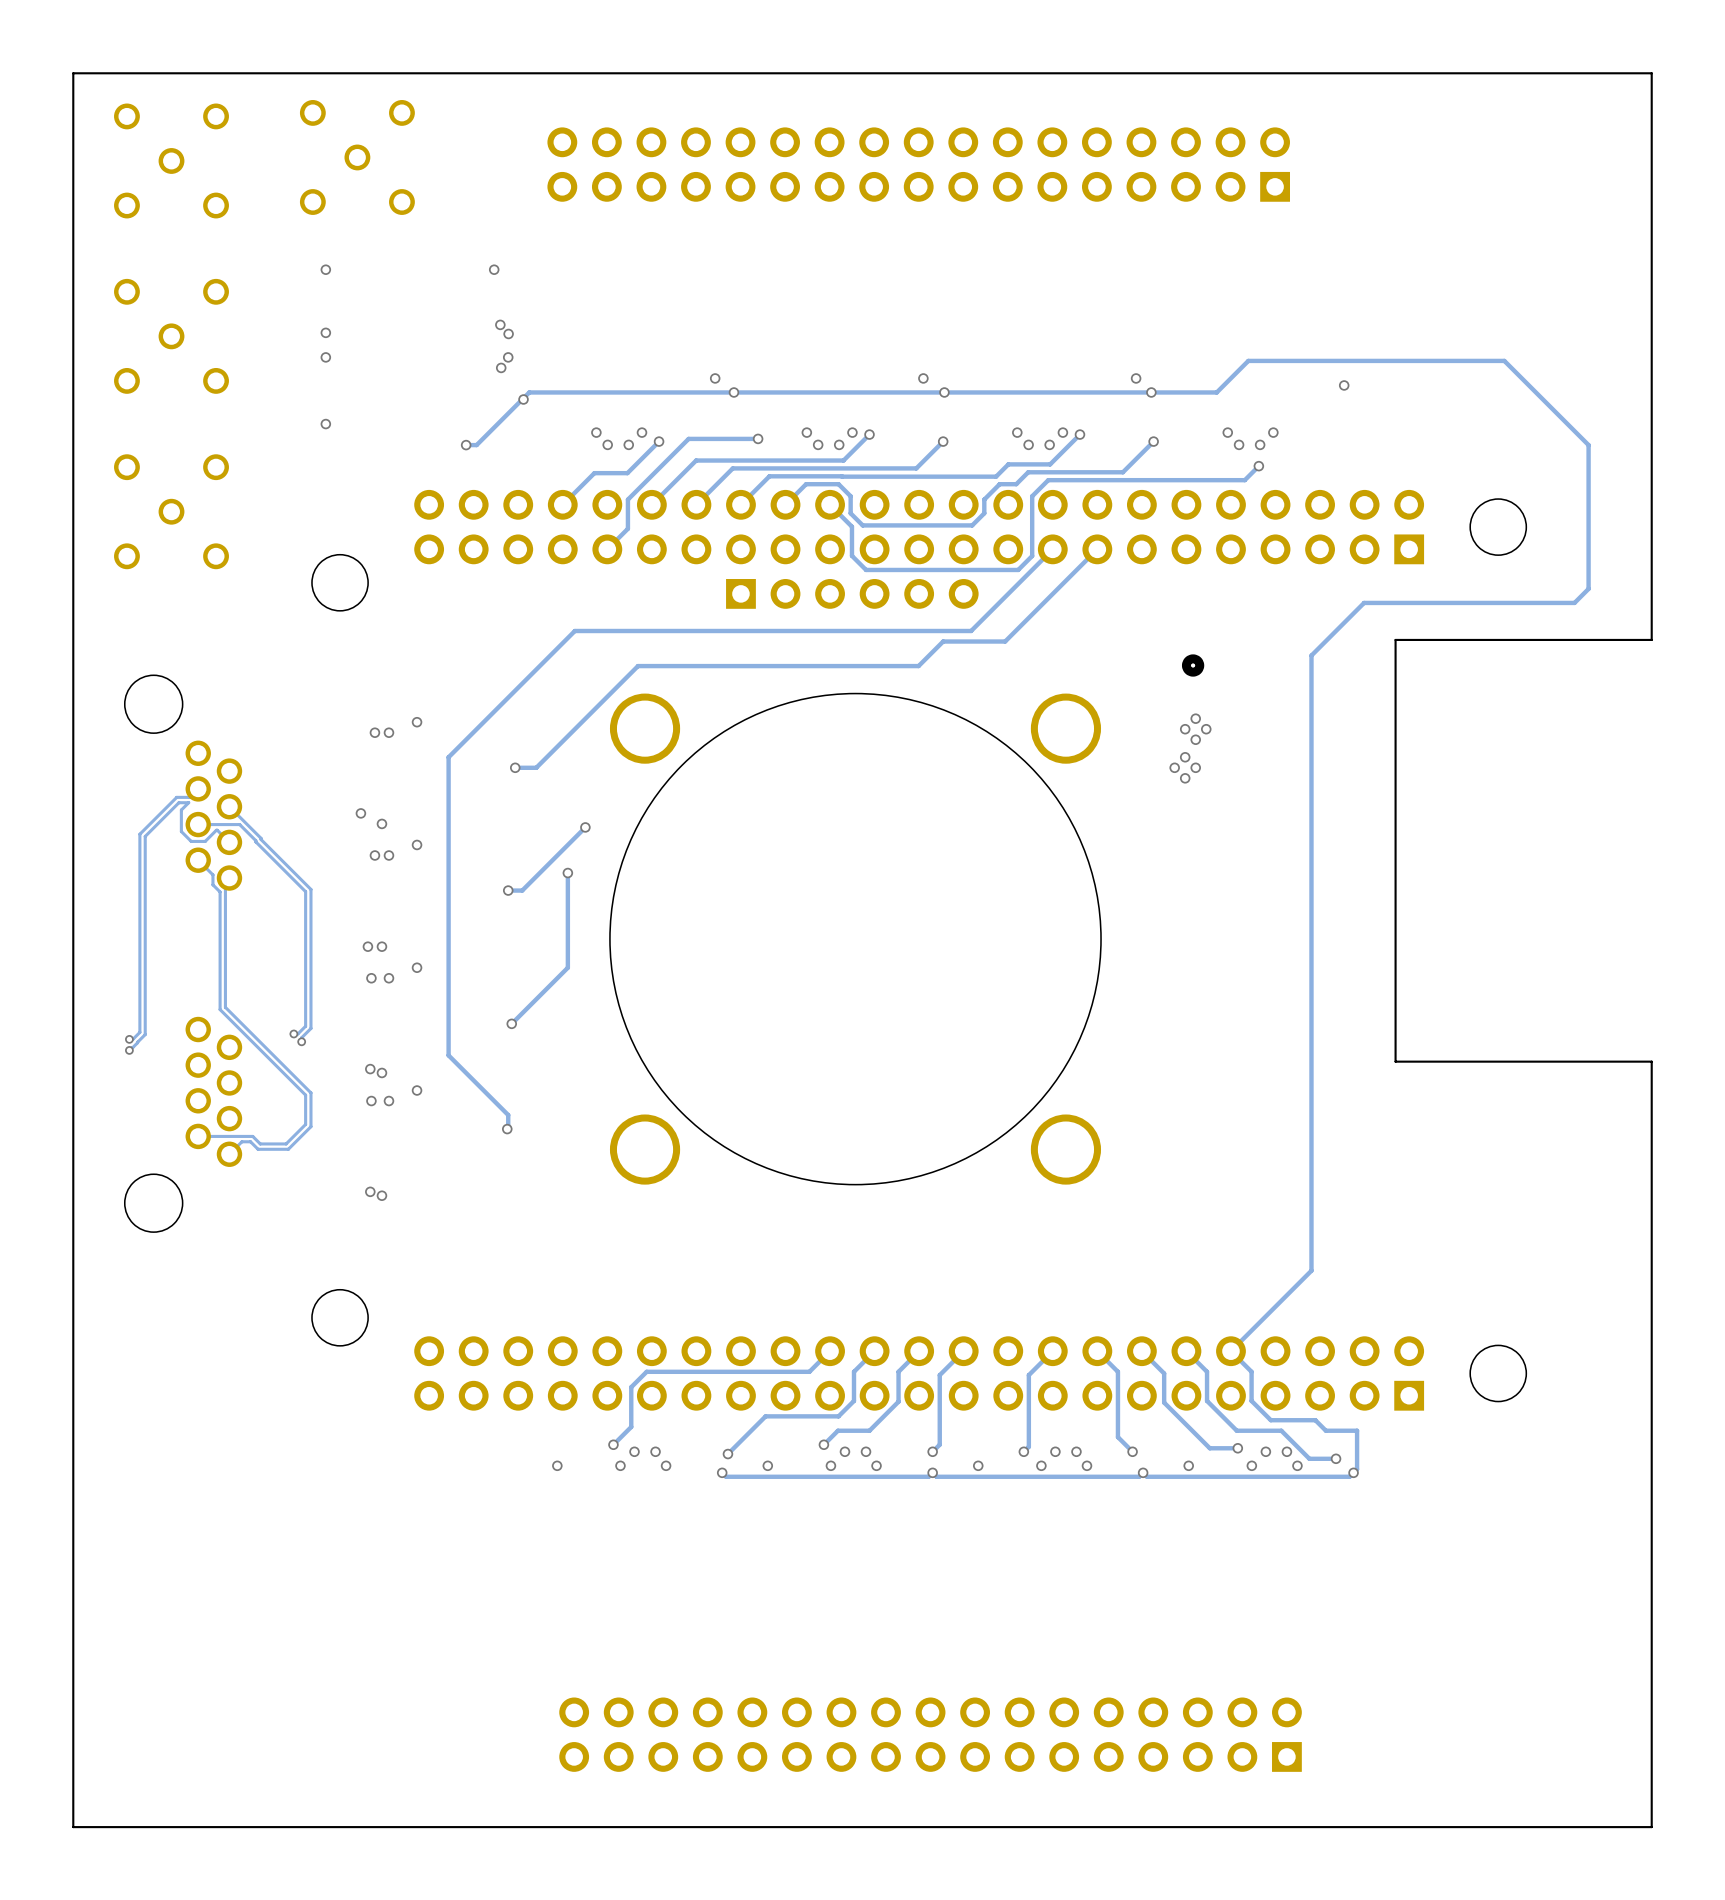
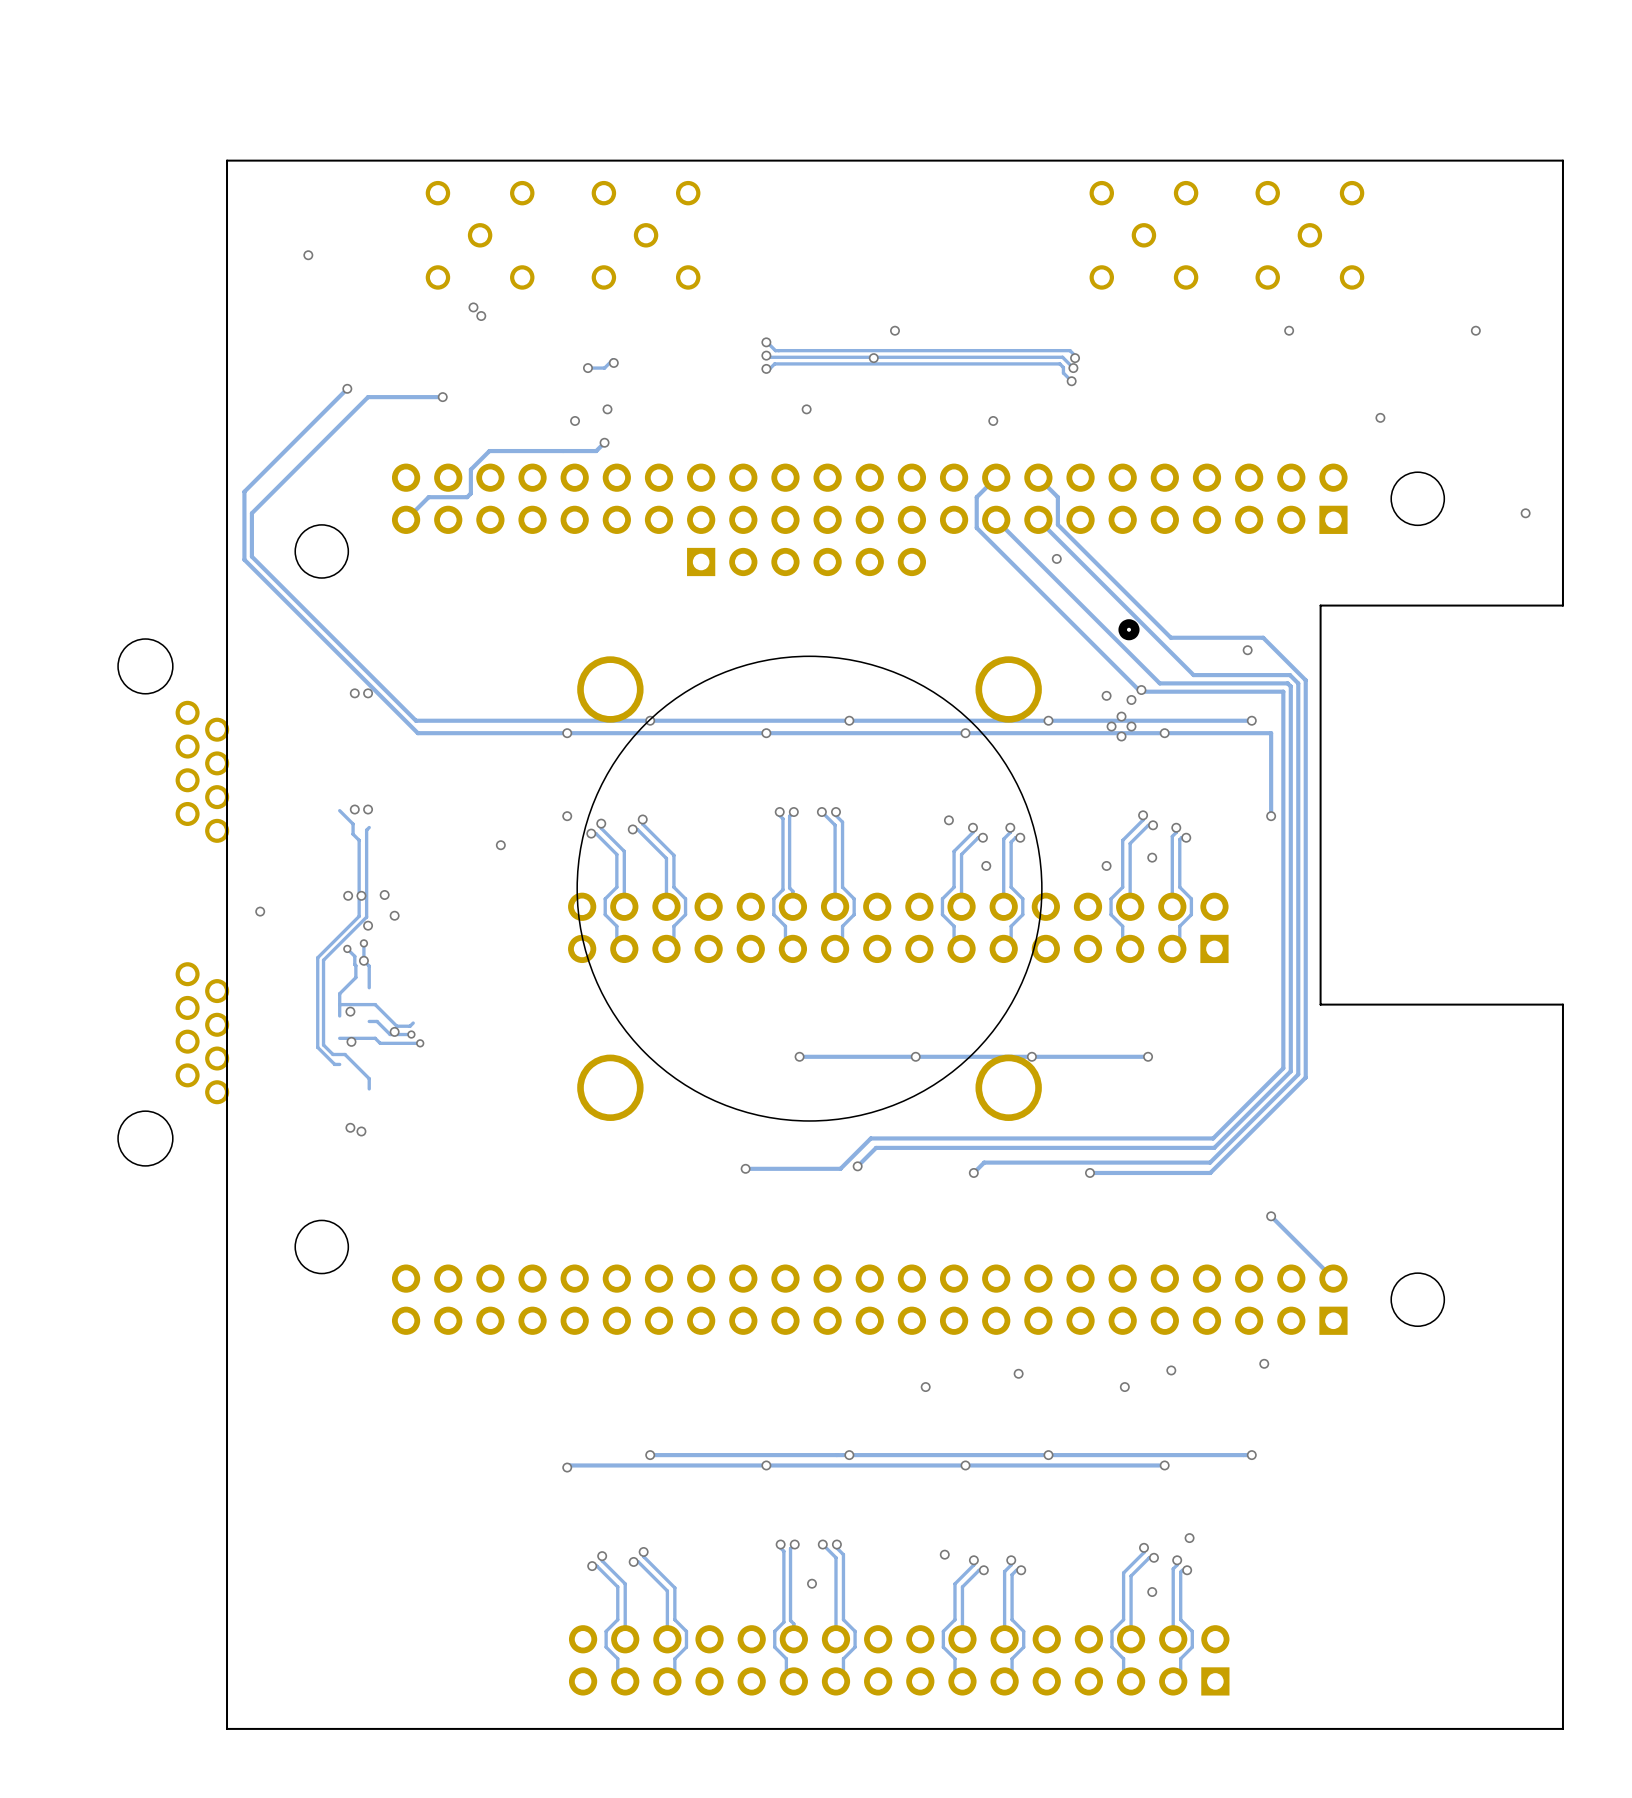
part: (357, 157) -> none
part: (171, 160) -> none
part: (918, 164) -> none
board edge: (1651, 169) (1651, 73) (73, 73) (73, 1827) (239, 1827) -> (1562, 160) (227, 160) (227, 1728)
part: none -> (480, 235)
part: none -> (646, 235)
part: none -> (1143, 235)
part: none -> (1309, 235)
via: (494, 269) -> none
via: (325, 332) -> none
part: (171, 336) -> none
via: none -> (1475, 330)
via: (325, 357) -> none
via: (508, 357) -> none
track: none -> (766, 342) (775, 350) (1070, 350) (1073, 354)
via: none -> (766, 342)
via: (501, 367) -> none
track: none -> (766, 355) (768, 357) (1062, 357) (1073, 368)
via: none -> (766, 355)
via: (715, 378) -> none
track: none -> (613, 362) (612, 359) (604, 368) (587, 368)
via: none -> (613, 362)
via position: (1344, 385) -> (1289, 330)
via: none -> (587, 368)
via: none -> (1073, 368)
track: none -> (766, 368) (769, 368) (774, 363) (1059, 363) (1063, 367) (1063, 373) (1071, 381)
via: none -> (766, 368)
via: (733, 392) -> none
via position: (944, 392) -> (894, 330)
via: (1151, 392) -> none
via: (523, 399) -> none
via: none -> (1071, 381)
track: none -> (347, 388) (244, 491) (244, 559) (417, 733) (1271, 733) (1271, 816)
via: none -> (347, 388)
track: none -> (442, 397) (368, 397) (251, 513) (251, 556) (415, 720) (1251, 720)
via: (325, 424) -> none
via: (596, 432) -> none
via: (806, 432) -> none
via: (1017, 432) -> none
via: (1062, 432) -> none
via: (1227, 432) -> none
via: (1273, 432) -> none
track: (869, 434) (843, 460) (696, 460) (651, 504) -> none
via: (869, 434) -> none
track: (1079, 434) (1050, 464) (1008, 464) (996, 476) (769, 476) (740, 504) -> none
via: (1079, 434) -> none
track: (758, 438) (688, 438) (627, 499) (627, 528) (607, 549) -> none
via: (758, 438) -> none
track: (659, 441) (627, 473) (594, 473) (562, 504) -> none
via: (659, 441) -> none
track: (943, 441) (916, 468) (732, 468) (696, 504) -> none
via: (943, 441) -> none
track: (1153, 441) (1122, 472) (1028, 472) (1016, 484) (999, 484) (984, 499) (984, 513) (972, 525) (862, 525) (850, 513) (850, 496) (838, 484) (806, 484) (785, 504) -> none
via: (1153, 441) -> none
via: none -> (1380, 417)
via: (628, 444) -> none
via: (818, 444) -> none
via: (839, 444) -> none
via: (1028, 444) -> none
via: (1239, 444) -> none
via: (1260, 444) -> none
track: (466, 445) (476, 445) (529, 392) (1216, 392) (1248, 360) (1504, 360) (1588, 445) (1588, 588) (1574, 602) (1364, 602) (1311, 655) (1311, 1270) (1230, 1351) (1251, 1371) (1251, 1400) (1270, 1420) (1315, 1420) (1325, 1430) (1357, 1430) (1357, 1469) (1349, 1476) (1147, 1476) (1143, 1472) (1139, 1476) (936, 1476) (932, 1472) (928, 1476) (726, 1476) (722, 1472) -> none
via position: (466, 445) -> (442, 397)
track: (1258, 466) (1244, 480) (1048, 480) (1032, 496) (1032, 525) -> (996, 477) (976, 497)
via: (1258, 466) -> none
track: none -> (604, 442) (596, 451) (489, 451) (470, 469) (470, 493) (467, 497) (428, 497) (406, 519)
via: none -> (604, 442)
track: (830, 504) (851, 526) (851, 555) (866, 569) (1018, 569) (1032, 556) -> (745, 1168) (840, 1168) (870, 1138) (1213, 1138) (1283, 1068) (1283, 691) (1140, 691) (976, 526)
track: none -> (1038, 477) (1057, 497) (1057, 524) (1170, 637) (1263, 637) (1305, 680) (1305, 1077) (1210, 1172) (1089, 1172)
part: (171, 511) -> none
via: none -> (1525, 513)
track: (1052, 549) (971, 631) (574, 631) (448, 757) (448, 1055) (508, 1115) (507, 1129) -> (996, 519) (1159, 683) (1287, 683) (1290, 686) (1290, 1071) (1214, 1147) (876, 1147) (857, 1166)
track: (1097, 549) (1005, 641) (943, 641) (918, 666) (638, 666) (536, 767) (515, 767) -> (1038, 519) (1193, 675) (1289, 675) (1298, 683) (1298, 1074) (1210, 1162) (984, 1162) (973, 1172)
via: none -> (1056, 558)
via: none -> (1247, 650)
via: (1195, 718) -> none
via: (417, 722) -> none
via: (1185, 729) -> none
via: none -> (1106, 695)
via: none -> (650, 720)
via: none -> (849, 720)
via: none -> (1048, 720)
via: none -> (1251, 720)
via: (515, 767) -> none
via: none -> (567, 733)
via: none -> (766, 733)
via: none -> (965, 733)
via: none -> (1164, 733)
track: (198, 788) (189, 797) (176, 797) (139, 834) (139, 1032) (132, 1039) (129, 1039) -> none
track: (229, 806) (310, 889) (310, 1028) (301, 1037) (301, 1041) -> none
via: (360, 813) -> none
via: (381, 823) -> none
track: (198, 824) (239, 824) (305, 891) (305, 1026) (297, 1033) (293, 1033) -> none
track: (585, 827) (522, 890) (508, 890) -> none
via: (585, 827) -> none
track: (229, 842) (217, 830) (205, 841) (191, 841) (181, 831) (181, 810) (188, 802) (178, 802) (145, 836) (145, 1034) (129, 1050) -> none
via: (417, 844) -> none
track: none -> (339, 810) (353, 824) (353, 834) (359, 840) (359, 916) (317, 957) (317, 1047) (334, 1064) (339, 1064)
track: none -> (779, 812) (779, 815) (782, 818) (782, 889) (773, 898) (773, 914) (785, 926) (785, 941) (792, 948)
via: none -> (779, 812)
track: none -> (793, 812) (789, 816) (789, 888) (792, 891) (792, 906)
via: none -> (793, 812)
track: none -> (821, 812) (835, 825) (835, 906)
via: none -> (821, 812)
track: none -> (835, 812) (835, 815) (842, 822) (842, 887) (854, 898) (854, 914) (842, 926) (842, 941) (835, 948)
via: none -> (835, 812)
track: (198, 860) (212, 874) (212, 884) (220, 891) (220, 1009) (305, 1095) (305, 1124) (286, 1143) (260, 1143) (252, 1136) (198, 1136) -> none
track: none -> (1143, 815) (1143, 820) (1122, 840) (1122, 887) (1111, 898) (1111, 914) (1122, 926) (1122, 941) (1130, 948)
via: none -> (1143, 815)
via: none -> (567, 816)
via: none -> (1271, 816)
track: none -> (642, 819) (642, 824) (673, 855) (673, 887) (685, 898) (685, 914) (673, 926) (673, 941) (666, 948)
via: none -> (642, 819)
via: none -> (948, 820)
track: none -> (601, 823) (601, 828) (624, 851) (624, 906)
via: none -> (601, 823)
track: none -> (1153, 825) (1148, 825) (1130, 843) (1130, 906)
via: none -> (1153, 825)
track: (567, 873) (567, 967) (511, 1023) -> none
via: (567, 873) -> none
track: none -> (369, 827) (366, 830) (366, 917) (323, 960) (323, 1045) (333, 1054) (345, 1054) (369, 1078) (369, 1088)
track: none -> (972, 827) (972, 832) (954, 851) (954, 887) (942, 898) (942, 914) (954, 926) (954, 941) (961, 948)
via: none -> (972, 827)
track: none -> (1010, 827) (1010, 832) (1003, 839) (1003, 906)
via: none -> (1010, 827)
track: none -> (1176, 827) (1176, 832) (1172, 836) (1172, 906)
via: none -> (1176, 827)
track: none -> (632, 829) (637, 829) (666, 858) (666, 906)
via: none -> (632, 829)
track: (229, 878) (225, 882) (225, 1007) (310, 1092) (310, 1126) (288, 1149) (258, 1149) (250, 1141) (241, 1141) (229, 1154) -> none
track: none -> (591, 833) (595, 833) (616, 854) (616, 887) (605, 898) (605, 914) (616, 926) (616, 941) (624, 948)
via: none -> (591, 833)
track: none -> (982, 837) (978, 837) (961, 854) (961, 906)
via: none -> (982, 837)
track: none -> (1020, 837) (1015, 837) (1011, 842) (1011, 887) (1022, 898) (1022, 914) (1011, 926) (1011, 941) (1003, 948)
via: none -> (1020, 837)
track: none -> (1186, 837) (1179, 839) (1179, 887) (1191, 898) (1191, 914) (1179, 926) (1179, 941) (1172, 948)
via: none -> (1186, 837)
via position: (508, 890) -> (500, 845)
via: none -> (1152, 857)
via: none -> (986, 865)
via: none -> (1106, 865)
via: none -> (384, 894)
via: none -> (260, 911)
via: (371, 978) -> none
part: none -> (898, 927)
track: none -> (363, 943) (363, 960) (369, 966) (369, 987)
via: none -> (363, 943)
track: none -> (347, 948) (354, 956) (355, 977) (339, 993) (339, 1015)
via: none -> (347, 948)
via: none -> (363, 960)
via: (511, 1023) -> none
via: (293, 1033) -> none
via: (129, 1039) -> none
via: (301, 1041) -> none
via: (129, 1050) -> none
track: none -> (339, 1004) (375, 1004) (396, 1026) (410, 1026) (413, 1023)
via: (381, 1072) -> none
track: none -> (369, 1021) (377, 1021) (390, 1034) (411, 1034)
via: none -> (411, 1034)
track: none -> (339, 1038) (375, 1038) (380, 1043) (420, 1043)
via: (388, 1101) -> none
via: none -> (420, 1043)
via: none -> (799, 1056)
via: none -> (915, 1056)
via: none -> (1031, 1056)
track: none -> (1148, 1056) (799, 1056)
via: none -> (1148, 1056)
via: (507, 1129) -> none
via: none -> (857, 1166)
via: none -> (745, 1168)
via: none -> (973, 1172)
via: none -> (1089, 1172)
track: none -> (1271, 1216) (1333, 1278)
via: none -> (1271, 1216)
track: (830, 1351) (809, 1371) (646, 1371) (631, 1387) (631, 1426) (613, 1444) -> none
track: (874, 1351) (853, 1371) (853, 1400) (838, 1416) (765, 1416) (727, 1454) -> none
track: (919, 1351) (898, 1371) (898, 1401) (869, 1430) (837, 1430) (823, 1444) -> none
track: (963, 1351) (939, 1375) (939, 1444) (932, 1451) -> none
track: (1052, 1351) (1028, 1375) (1028, 1446) (1023, 1451) -> none
track: (1097, 1351) (1117, 1371) (1117, 1437) (1132, 1451) -> none
track: (1141, 1351) (1164, 1373) (1164, 1402) (1209, 1448) (1237, 1448) -> none
track: (1186, 1351) (1207, 1371) (1207, 1400) (1236, 1430) (1281, 1430) (1309, 1458) (1336, 1458) -> none
via: (613, 1444) -> none
via: (823, 1444) -> none
via: (634, 1451) -> none
via: (655, 1451) -> none
via: (844, 1451) -> none
via: (866, 1451) -> none
via: (932, 1451) -> none
via: (1023, 1451) -> none
via: (1055, 1451) -> none
via: (1132, 1451) -> none
via: (1265, 1451) -> none
via: (1286, 1451) -> none
via: (727, 1454) -> none
via position: (1336, 1458) -> (1264, 1363)
via: (557, 1465) -> none
via: (620, 1465) -> none
via: (666, 1465) -> none
via: (767, 1465) -> none
via: (830, 1465) -> none
via: (876, 1465) -> none
via: (1041, 1465) -> none
via: (1086, 1465) -> none
via: (1251, 1465) -> none
via: (1297, 1465) -> none
via: (722, 1472) -> none
via: (932, 1472) -> none
via: (1143, 1472) -> none
via: (1353, 1472) -> none
via: none -> (650, 1455)
via: none -> (849, 1455)
via: none -> (1048, 1455)
track: none -> (1251, 1455) (650, 1455)
via: none -> (1251, 1455)
via: none -> (766, 1465)
via: none -> (965, 1465)
track: none -> (1164, 1465) (569, 1465) (567, 1467)
via: none -> (1164, 1465)
via: none -> (567, 1467)
via: none -> (1189, 1538)
track: none -> (780, 1544) (780, 1548) (783, 1551) (783, 1622) (774, 1631) (774, 1647) (786, 1658) (786, 1673) (793, 1681)
via: none -> (780, 1544)
track: none -> (794, 1544) (790, 1548) (790, 1620) (793, 1623) (793, 1639)
via: none -> (794, 1544)
track: none -> (822, 1544) (835, 1557) (835, 1639)
via: none -> (822, 1544)
track: none -> (836, 1544) (836, 1548) (843, 1554) (843, 1619) (855, 1631) (855, 1647) (843, 1658) (843, 1673) (835, 1681)
via: none -> (836, 1544)
track: none -> (1144, 1547) (1144, 1552) (1123, 1572) (1123, 1619) (1111, 1631) (1111, 1647) (1123, 1658) (1123, 1673) (1131, 1681)
via: none -> (1144, 1547)
track: none -> (643, 1551) (643, 1556) (674, 1587) (674, 1619) (686, 1631) (686, 1647) (674, 1658) (674, 1673) (667, 1681)
via: none -> (643, 1551)
via: none -> (944, 1554)
track: none -> (602, 1556) (602, 1560) (625, 1583) (625, 1639)
via: none -> (602, 1556)
track: none -> (1153, 1557) (1149, 1557) (1131, 1576) (1131, 1639)
via: none -> (1153, 1557)
track: none -> (973, 1560) (973, 1564) (954, 1583) (954, 1619) (943, 1631) (943, 1647) (954, 1658) (954, 1673) (962, 1681)
via: none -> (973, 1560)
track: none -> (1011, 1560) (1011, 1564) (1004, 1571) (1004, 1639)
via: none -> (1011, 1560)
track: none -> (1177, 1560) (1177, 1564) (1173, 1568) (1173, 1639)
via: none -> (1177, 1560)
track: none -> (633, 1561) (638, 1561) (667, 1590) (667, 1639)
via: none -> (633, 1561)
track: none -> (592, 1566) (596, 1566) (617, 1586) (617, 1619) (606, 1631) (606, 1647) (617, 1658) (617, 1673) (625, 1681)
via: none -> (592, 1566)
track: none -> (983, 1570) (979, 1570) (962, 1586) (962, 1639)
via: none -> (983, 1570)
track: none -> (1021, 1570) (1016, 1570) (1012, 1574) (1012, 1619) (1023, 1631) (1023, 1647) (1012, 1658) (1012, 1673) (1004, 1681)
via: none -> (1021, 1570)
track: none -> (1187, 1570) (1180, 1572) (1180, 1619) (1192, 1631) (1192, 1647) (1180, 1658) (1180, 1673) (1173, 1681)
via: none -> (1187, 1570)
via: none -> (812, 1583)
via: none -> (1152, 1592)
part: (930, 1734) -> none
part: none -> (899, 1660)

